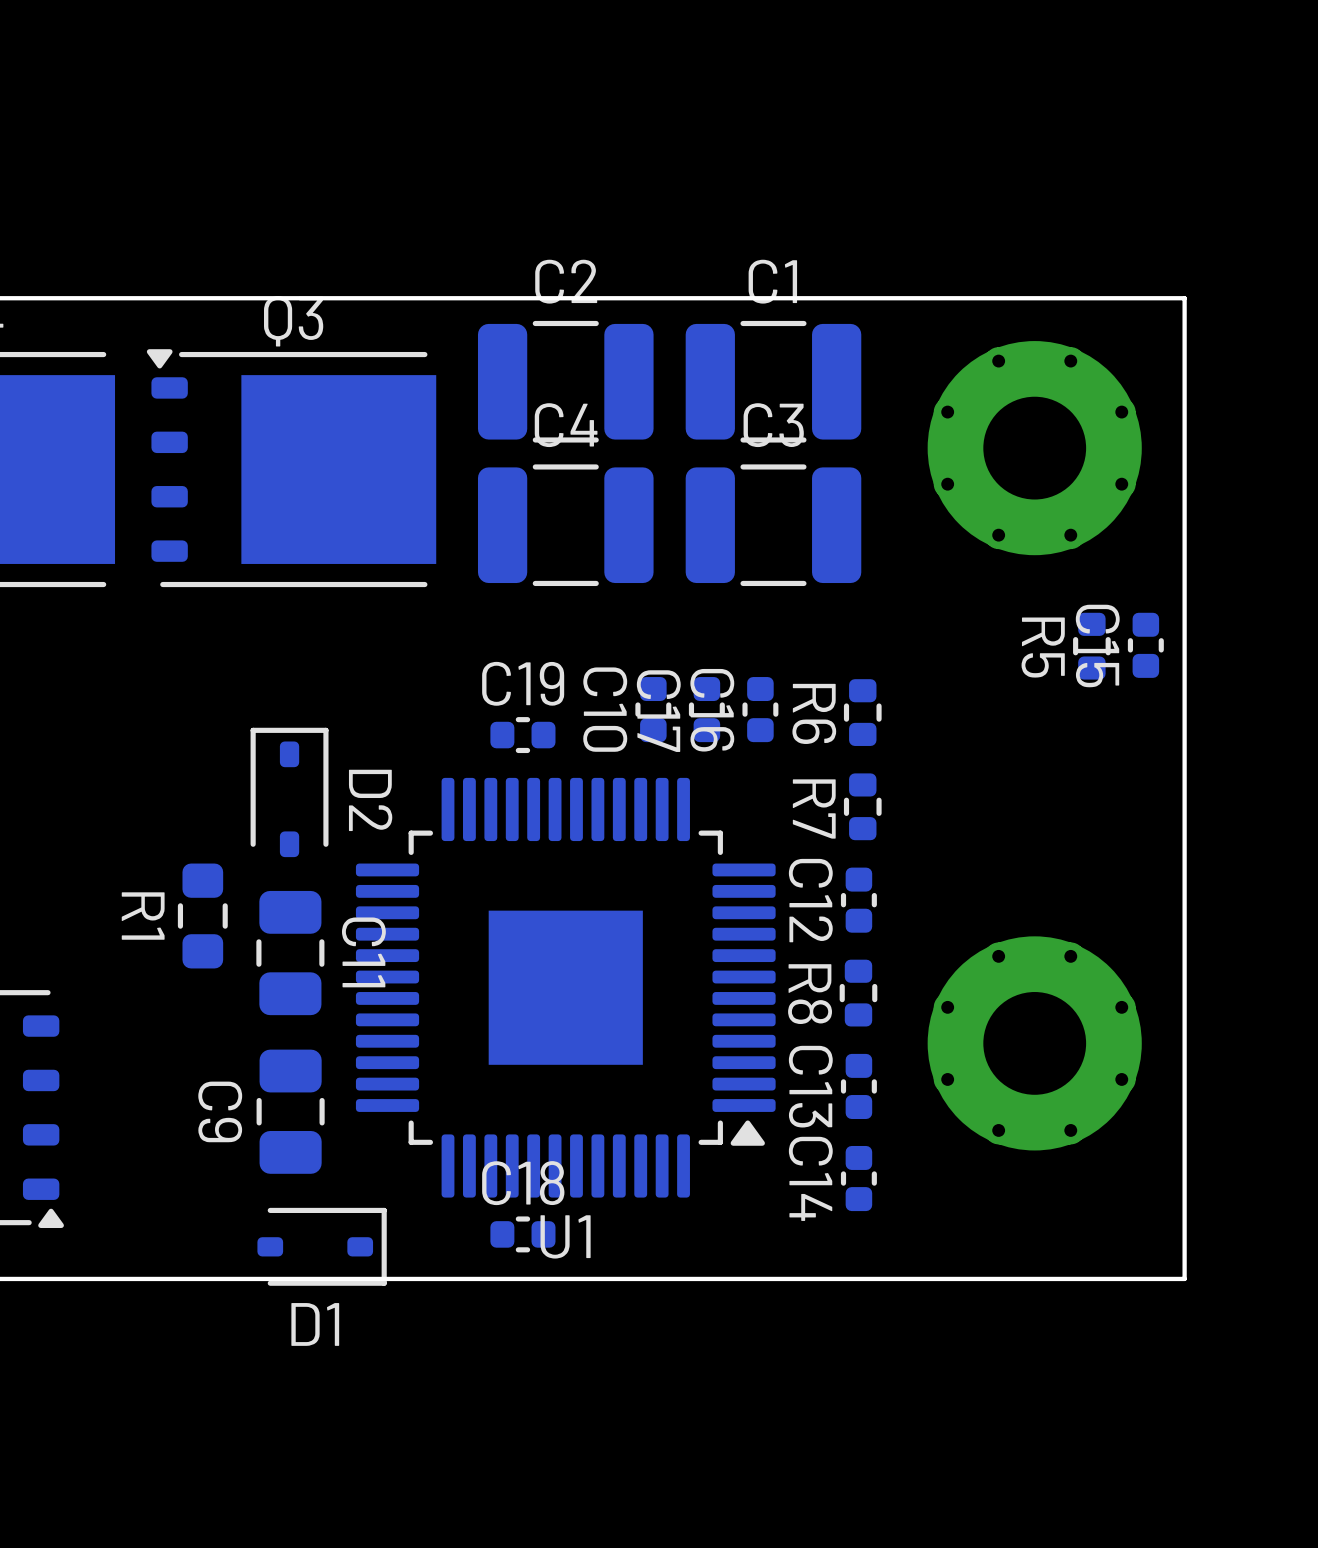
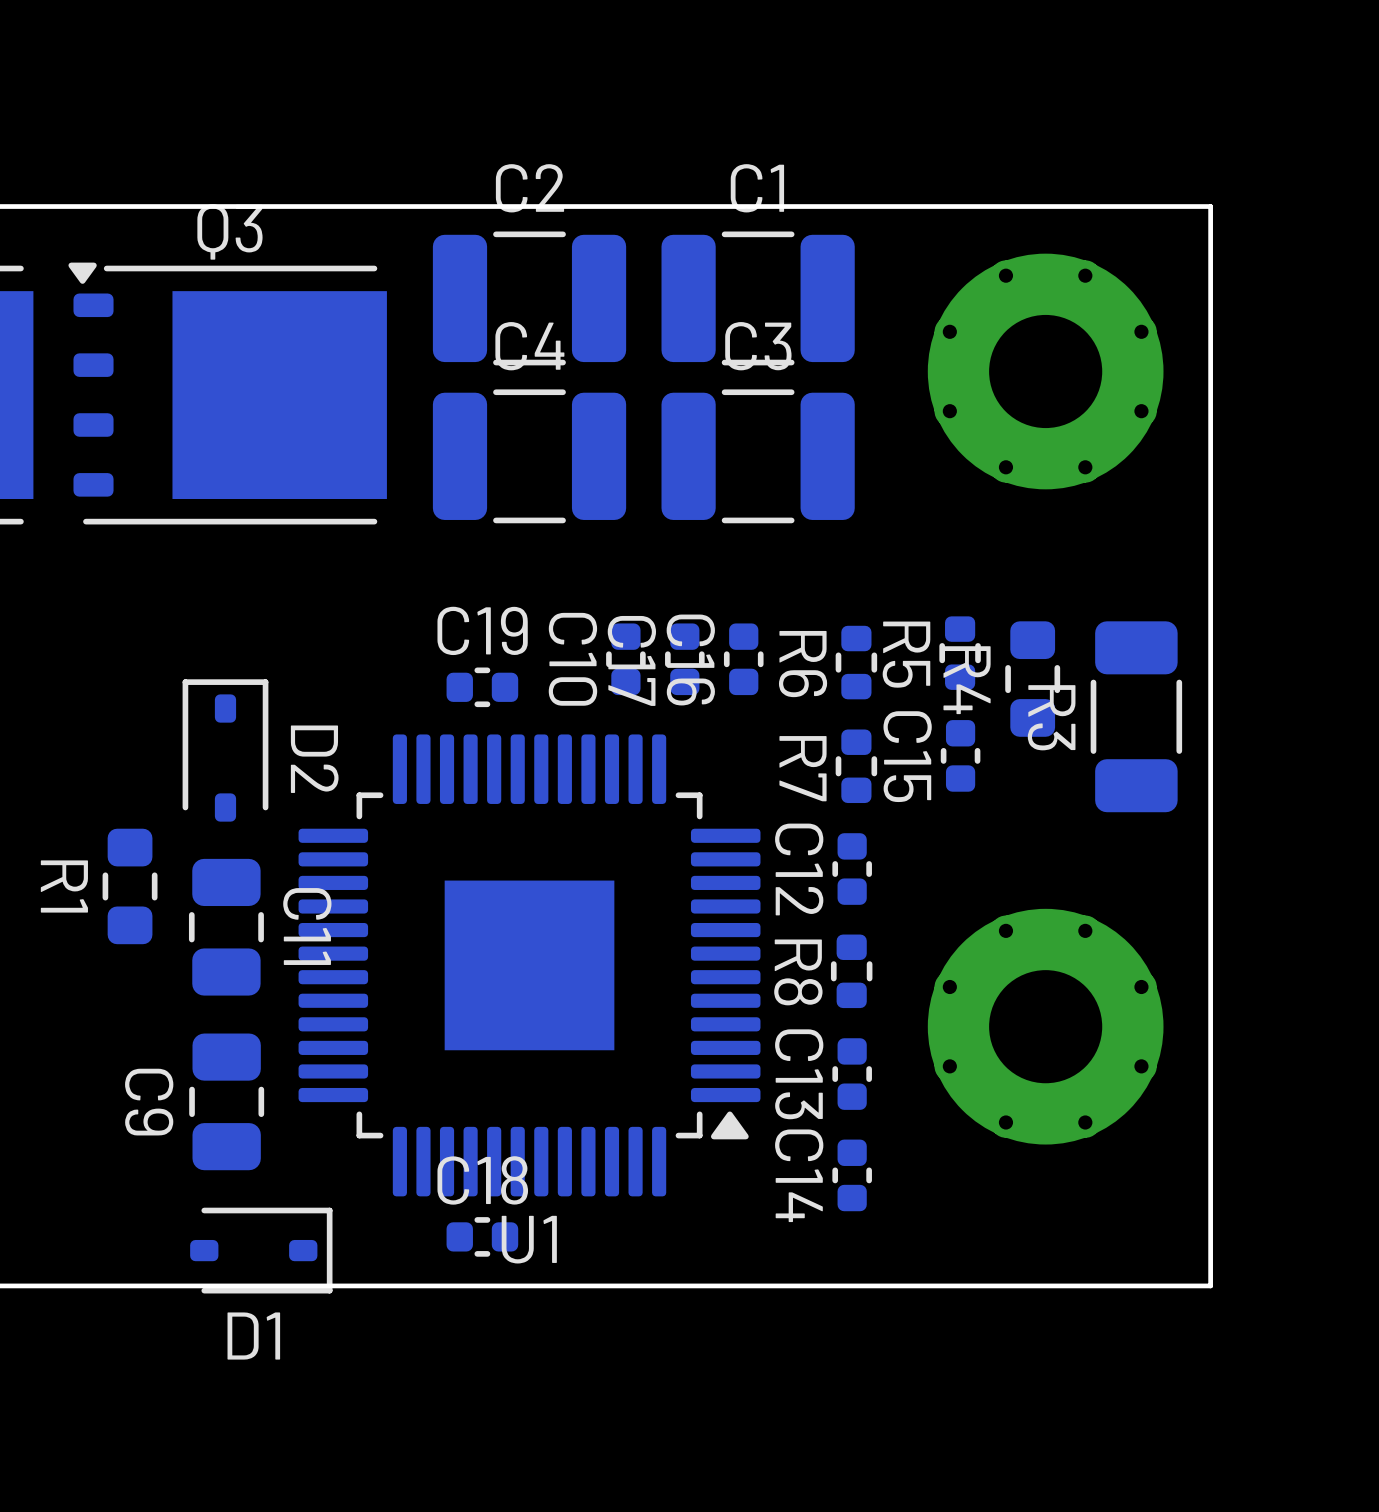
C15 position: (1145, 645) -> (960, 755)
R5 position: (1091, 646) -> (960, 653)
R4: none -> (1032, 679)
R3: none -> (1136, 716)

